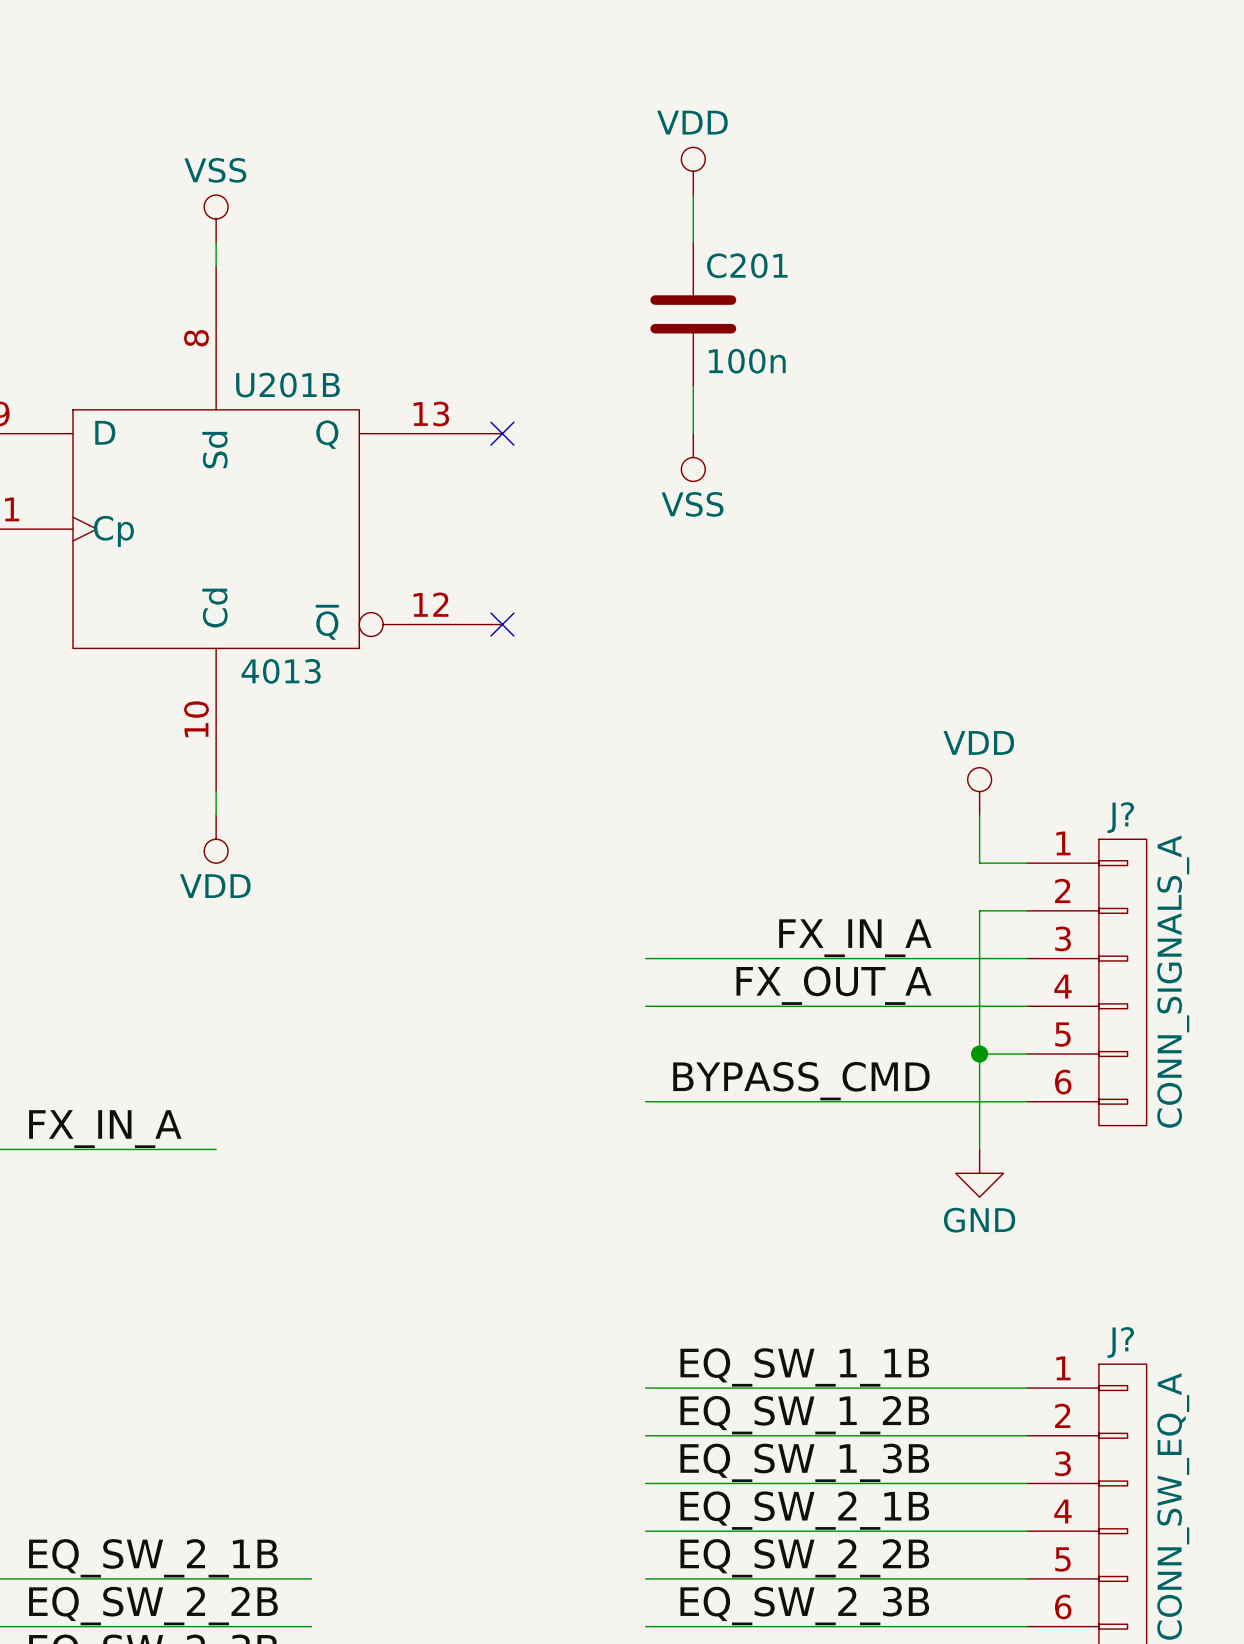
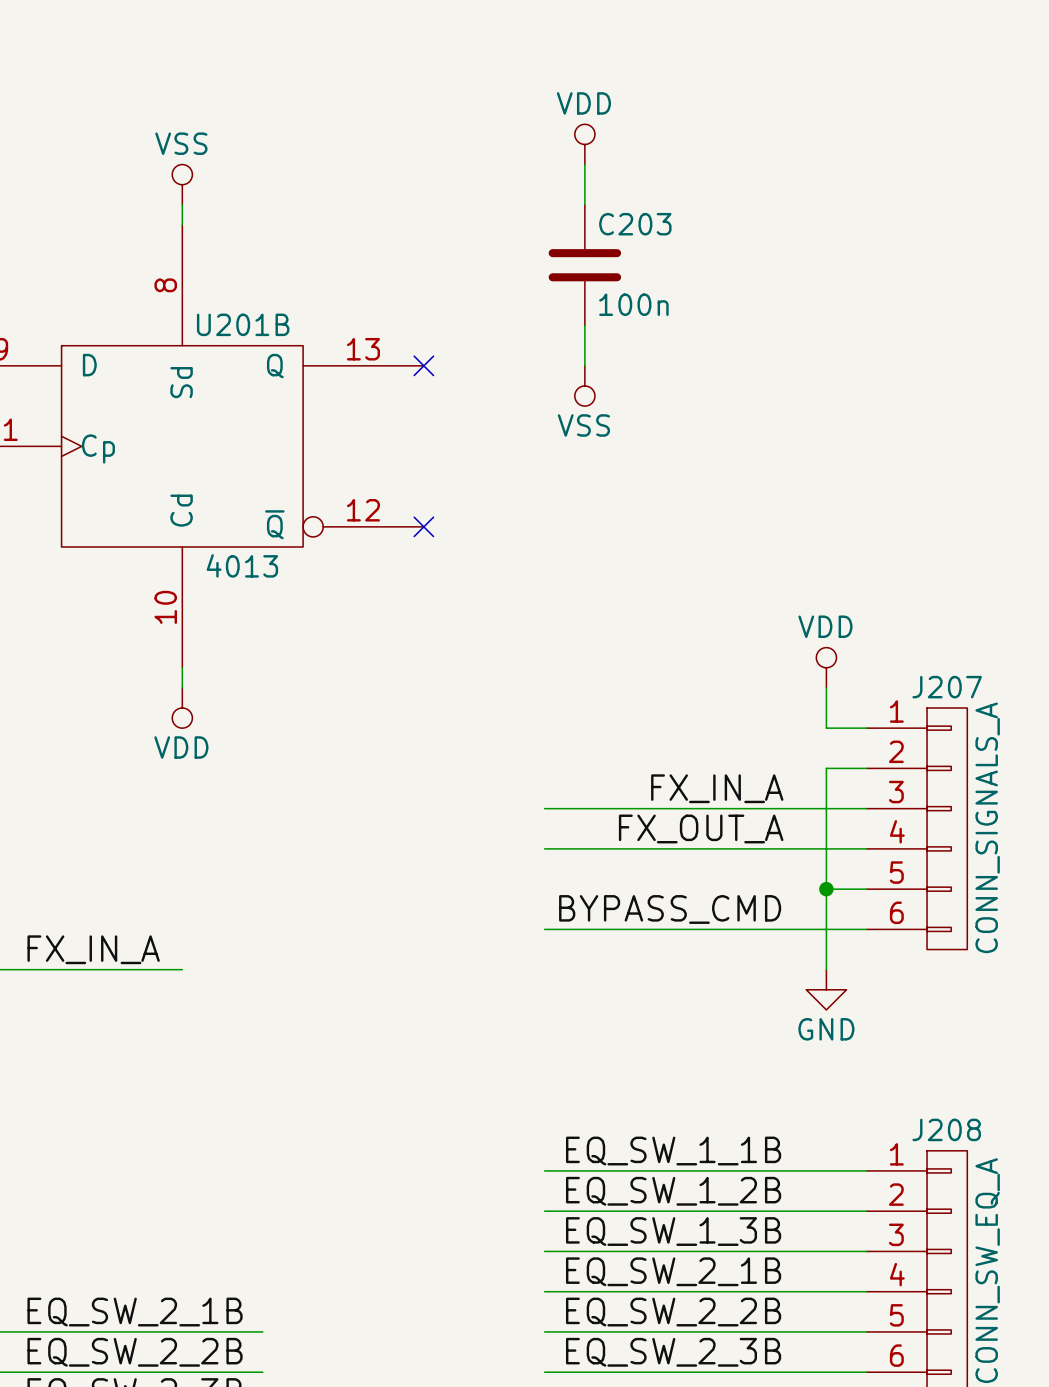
C201 name: C201 (747, 265) -> C203 (635, 224)
J? name: J? (1120, 817) -> J207 (947, 687)
J? name: J? (1120, 1342) -> J208 (946, 1129)

